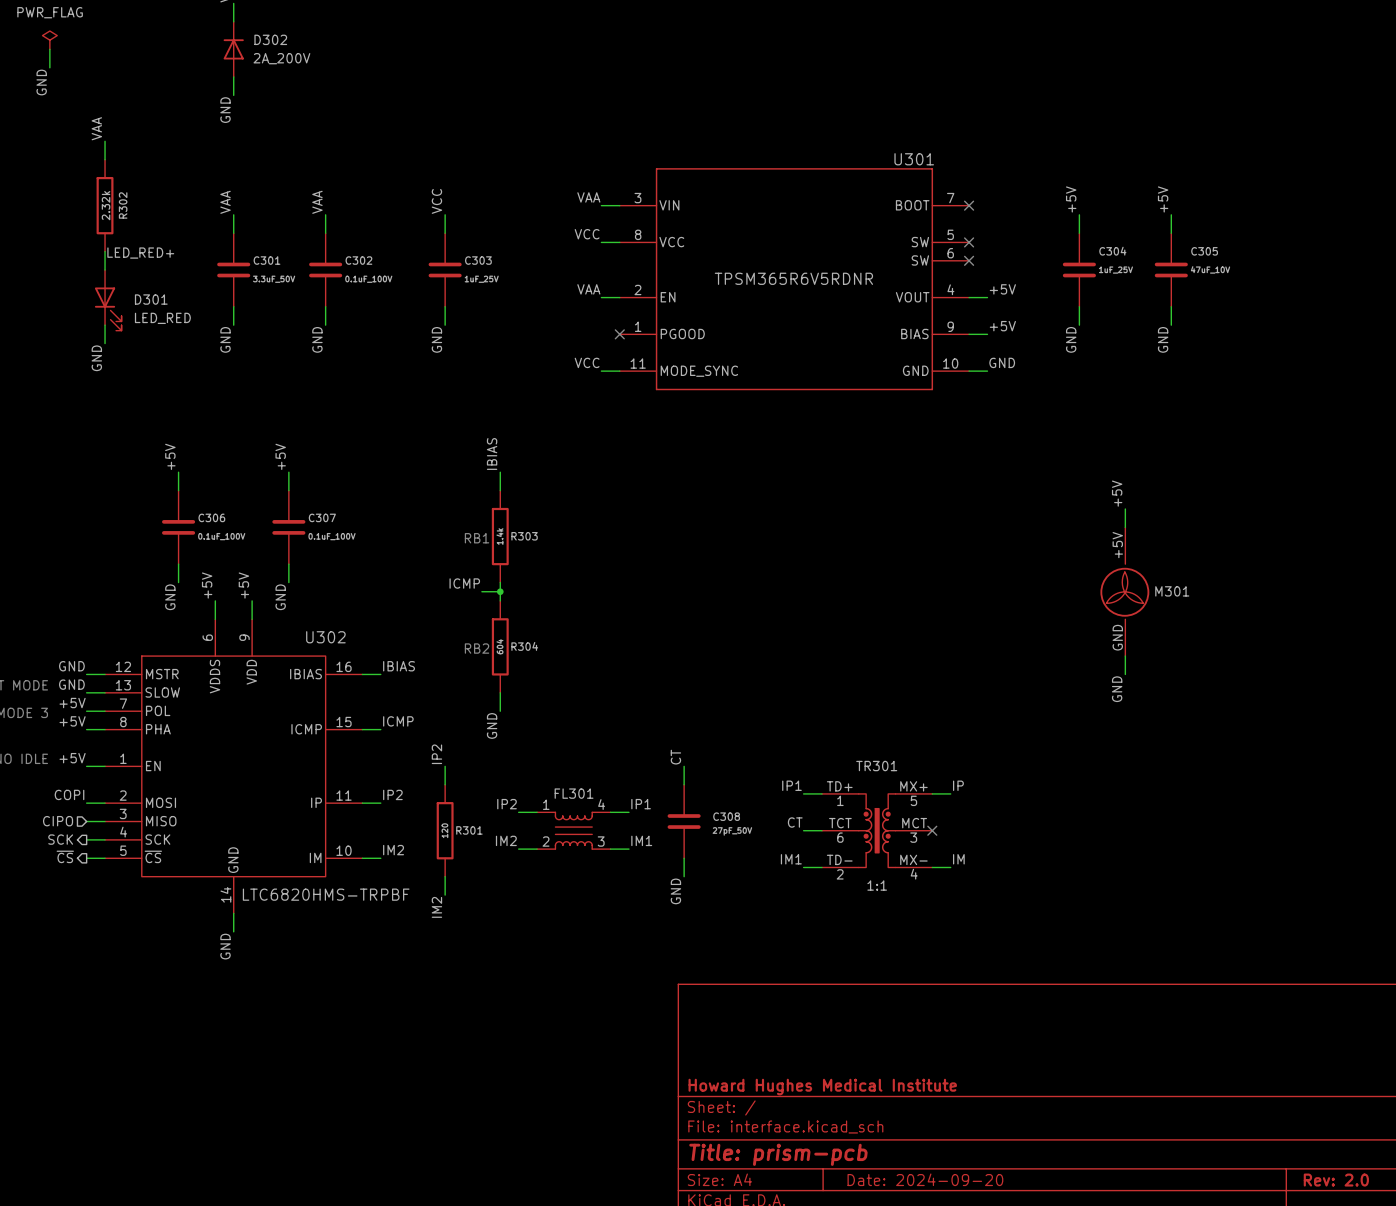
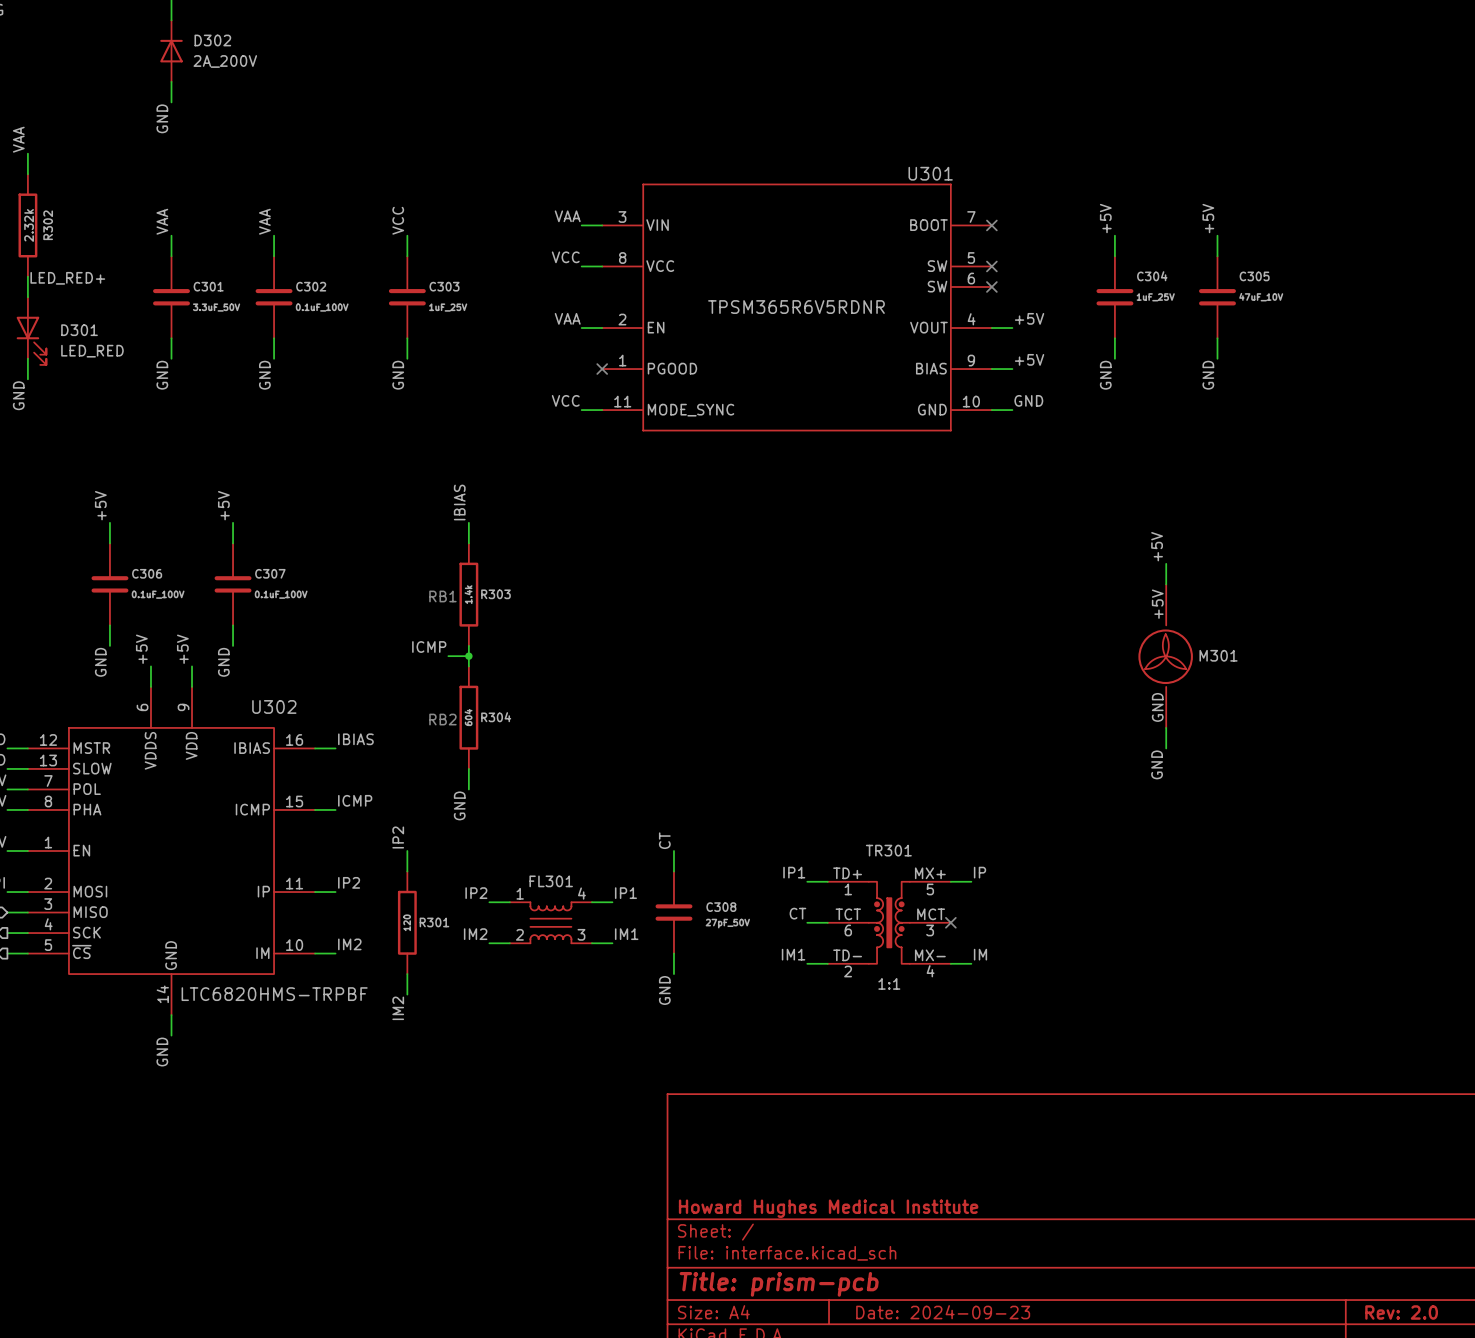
title block: Date: 2024-09-20 (925, 1179) -> Date: 2024-09-23 (943, 1312)

